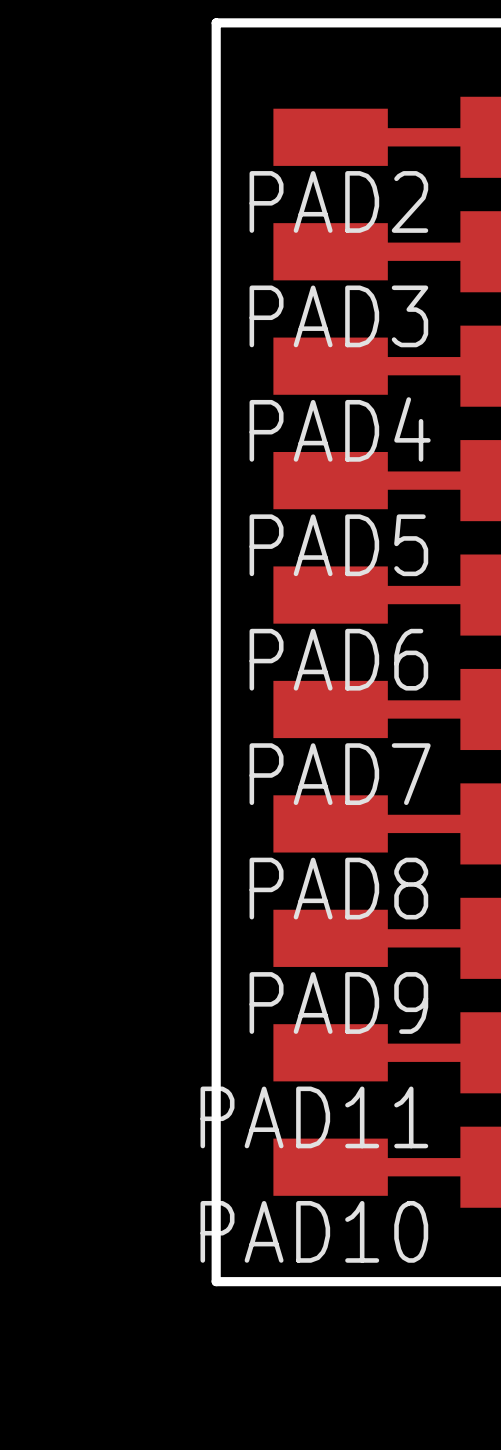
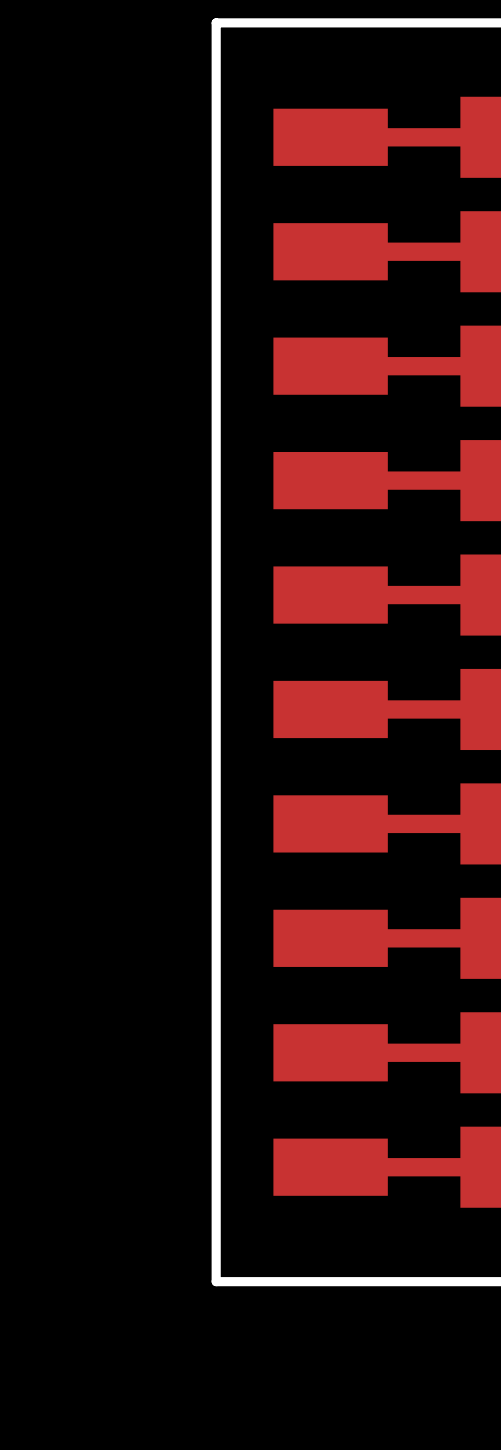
PAD2 name: PAD2 (338, 201) -> none
PAD3 name: PAD3 (338, 316) -> none
PAD4 name: PAD4 (340, 429) -> none
PAD5 name: PAD5 (338, 545) -> none
PAD6 name: PAD6 (338, 659) -> none
PAD7 name: PAD7 (340, 774) -> none
PAD8 name: PAD8 (338, 888) -> none
PAD9 name: PAD9 (338, 1003) -> none
PAD11 name: PAD11 (314, 1117) -> none
PAD10 name: PAD10 (314, 1231) -> none

